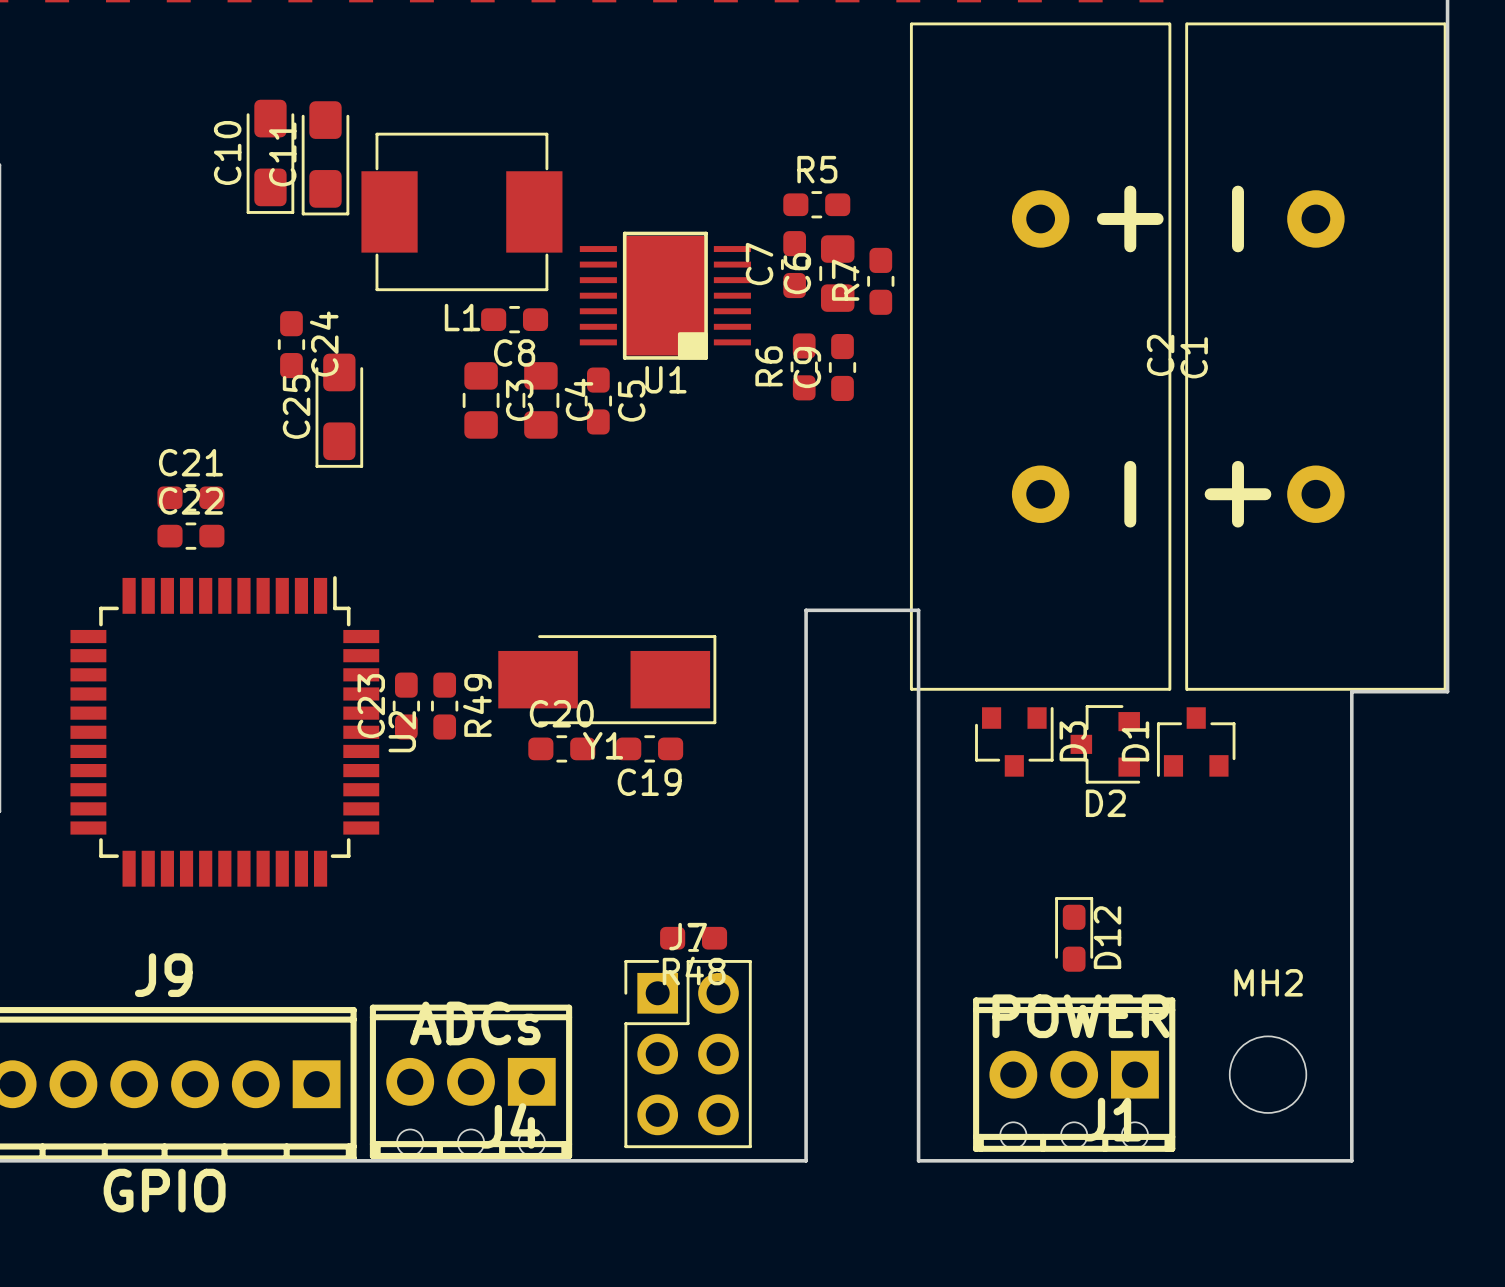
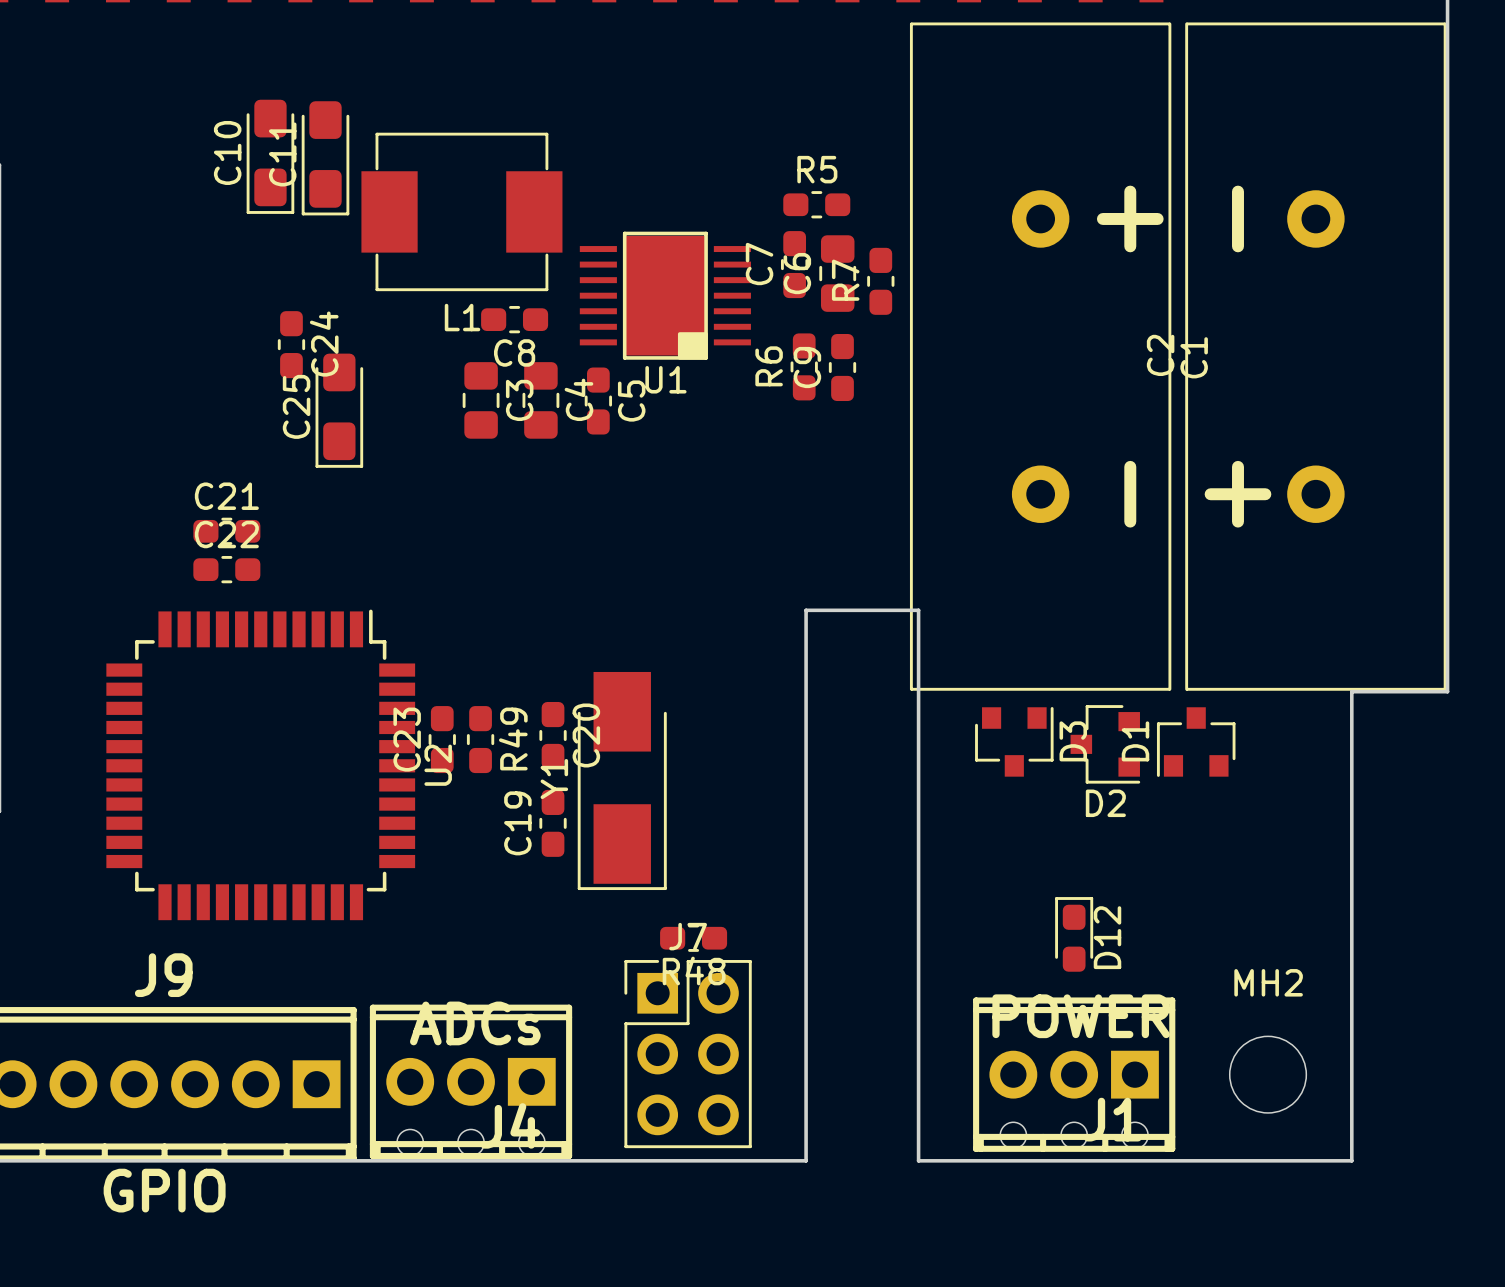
C21 position: (190, 497) -> (226, 531)
C22 position: (190, 536) -> (226, 569)
Y1 rotation: 0° (607, 679) -> 90° clockwise (622, 780)
C23 position: (406, 706) -> (442, 739)
R49 position: (444, 706) -> (480, 739)
U2 position: (224, 731) -> (260, 764)
C20 rotation: 0° (561, 748) -> 90° clockwise (553, 735)
C19 rotation: 0° (649, 748) -> 90° clockwise (553, 823)
C19 position: (649, 748) -> (553, 823)

